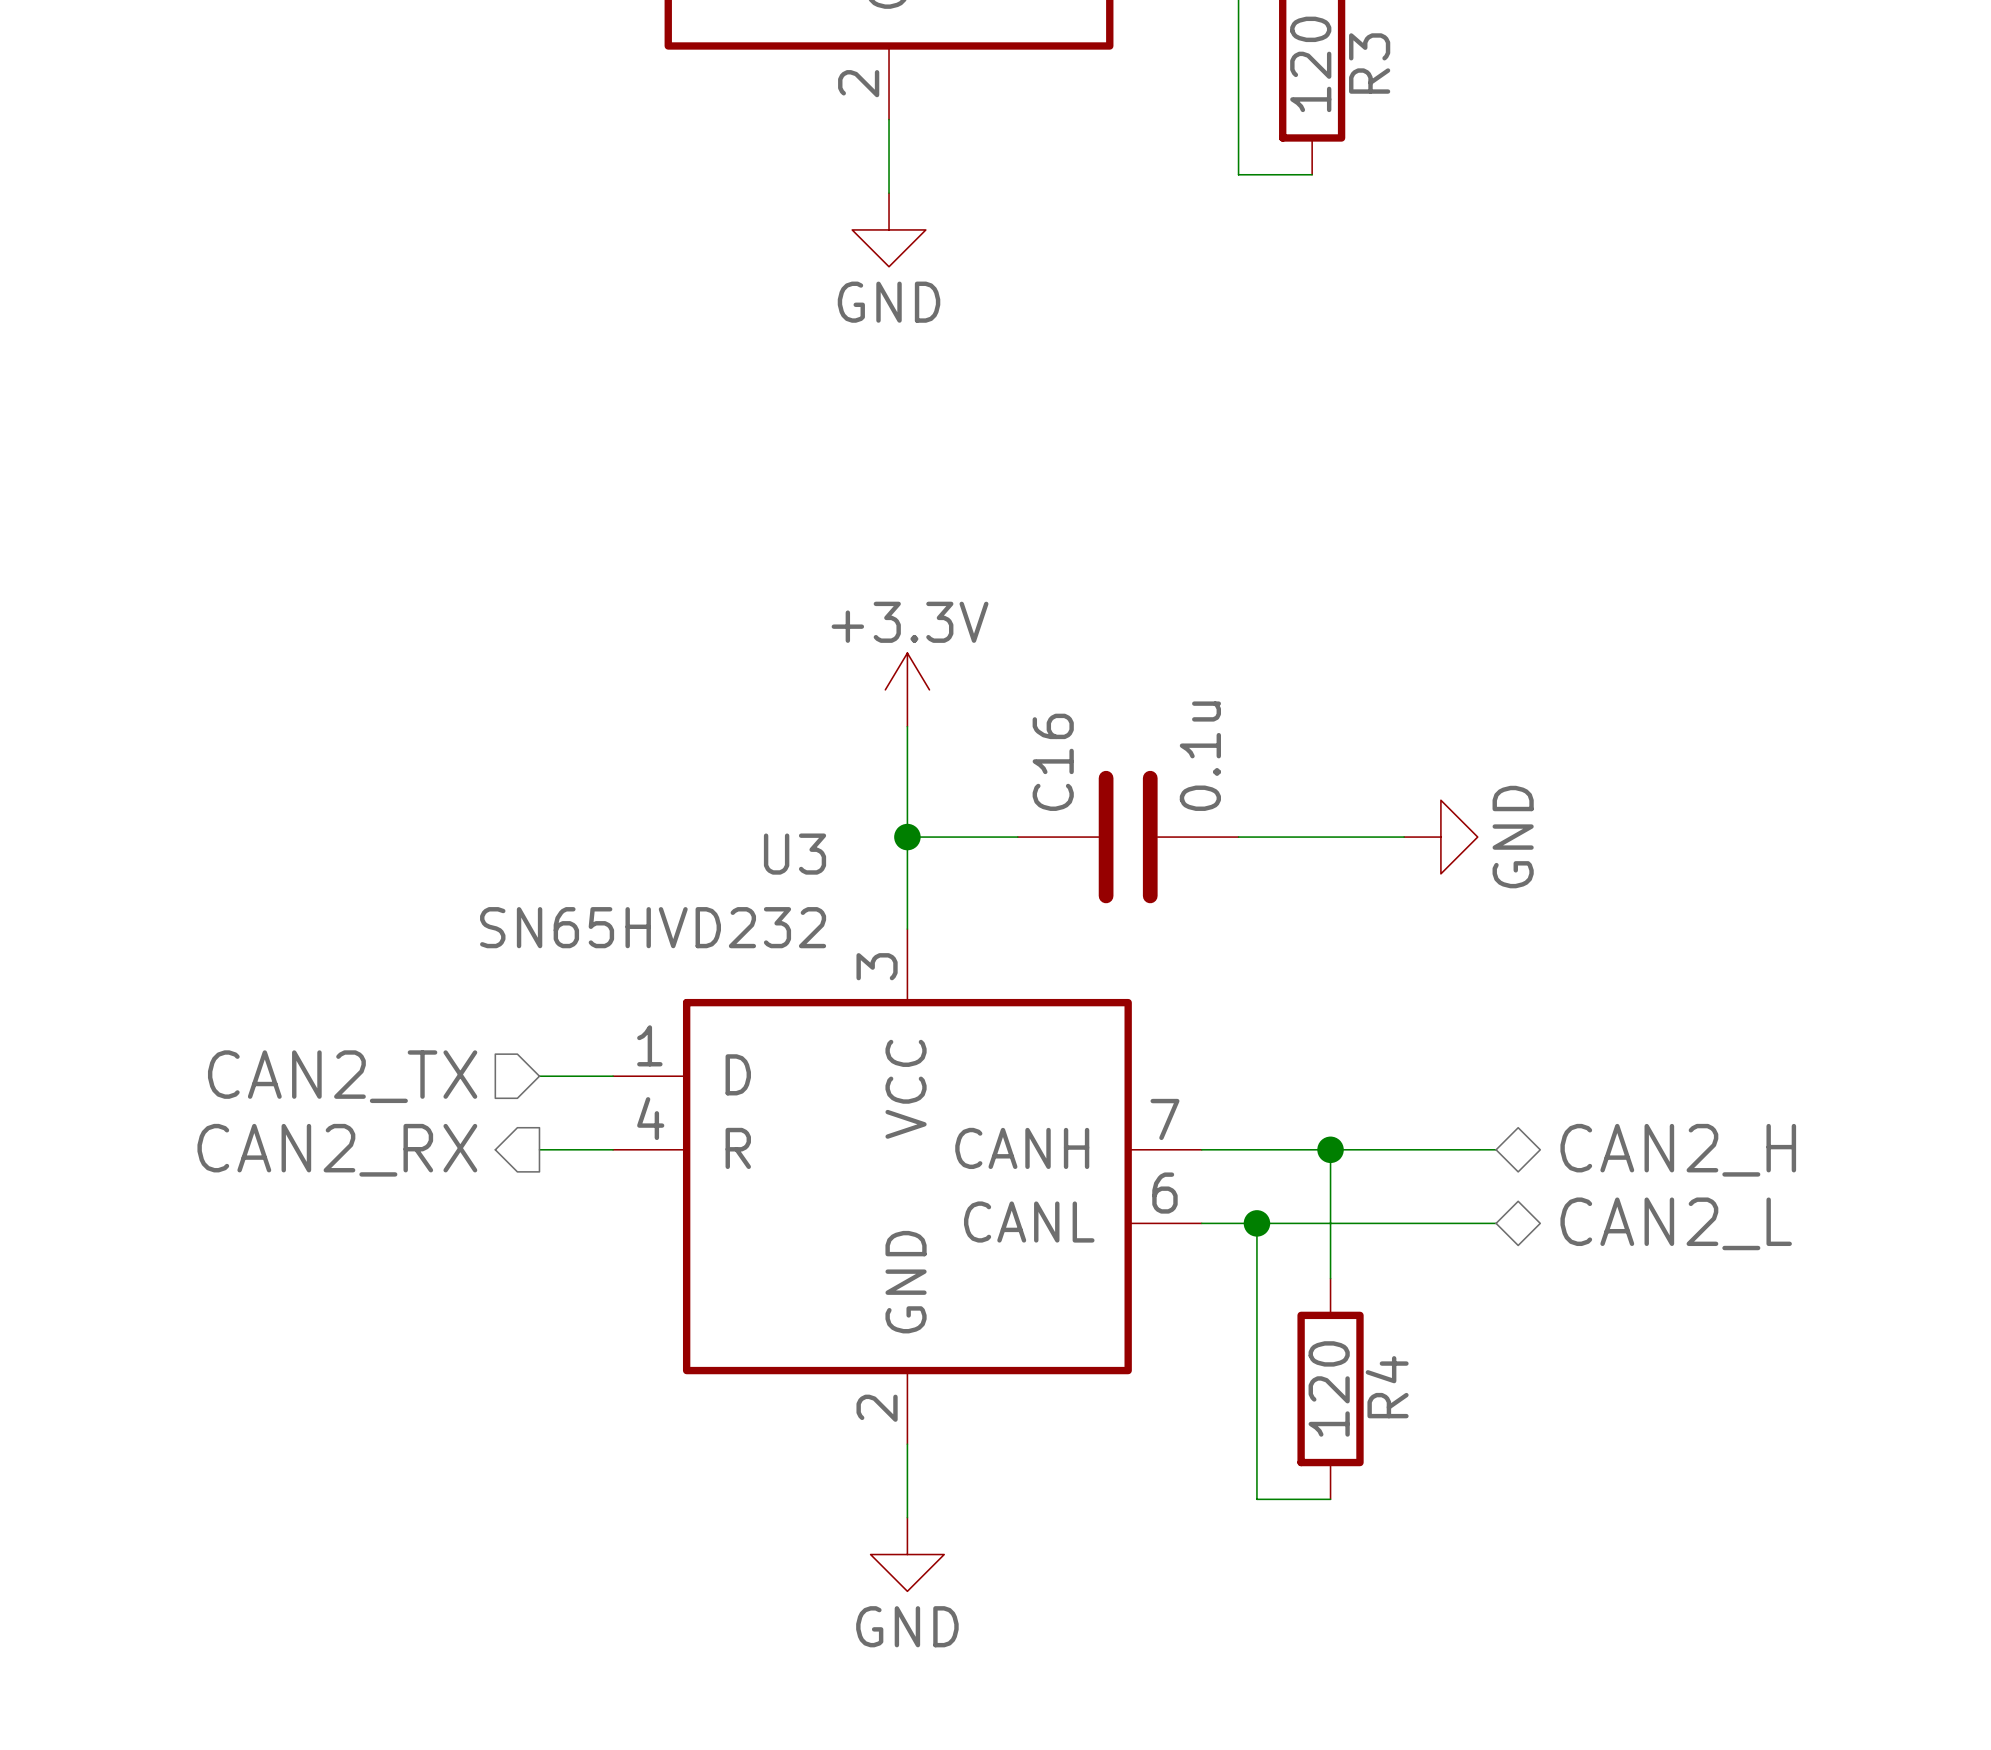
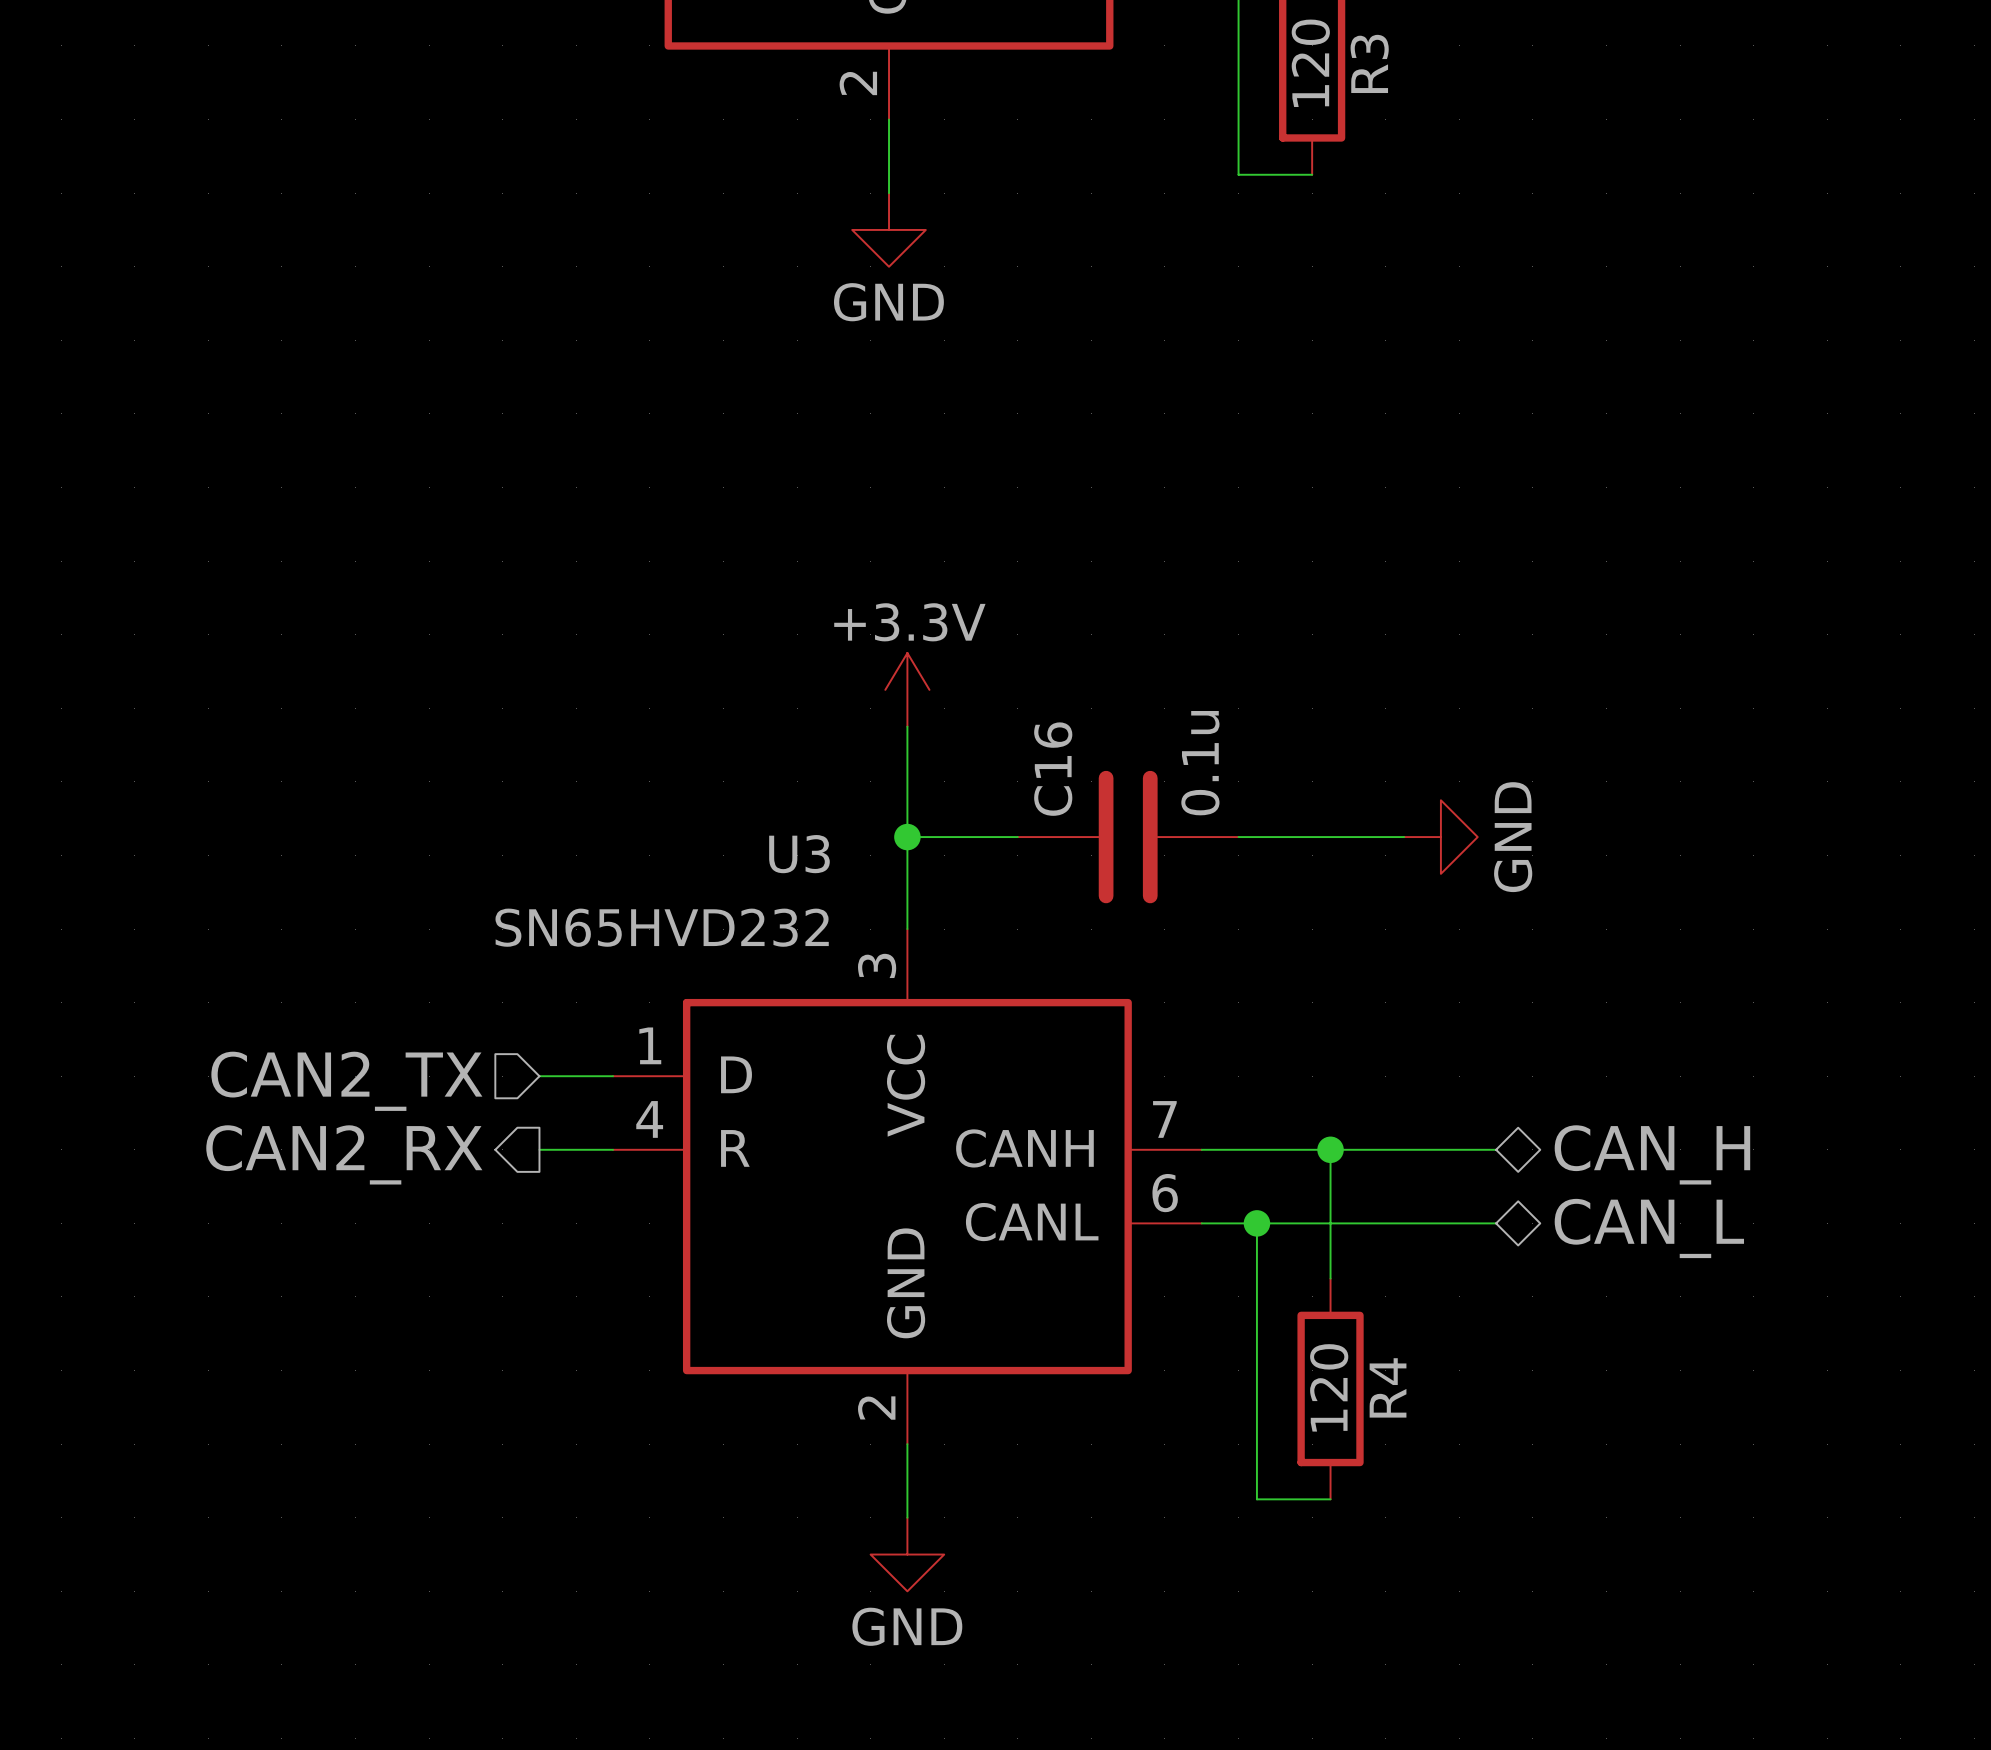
hierarchical label: CAN2_H (1678, 1150) -> CAN_H (1652, 1154)
hierarchical label: CAN2_L (1676, 1223) -> CAN_L (1649, 1228)

